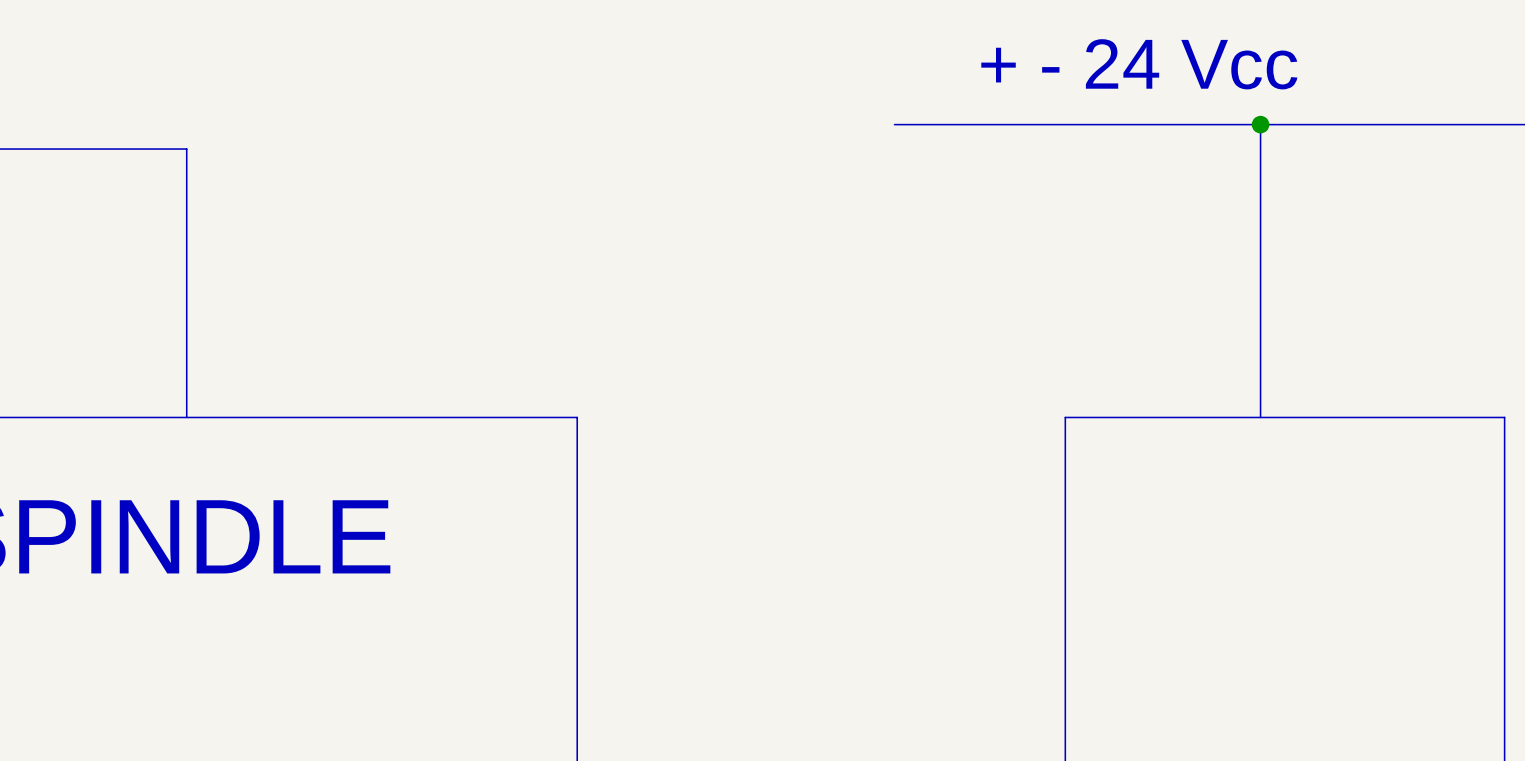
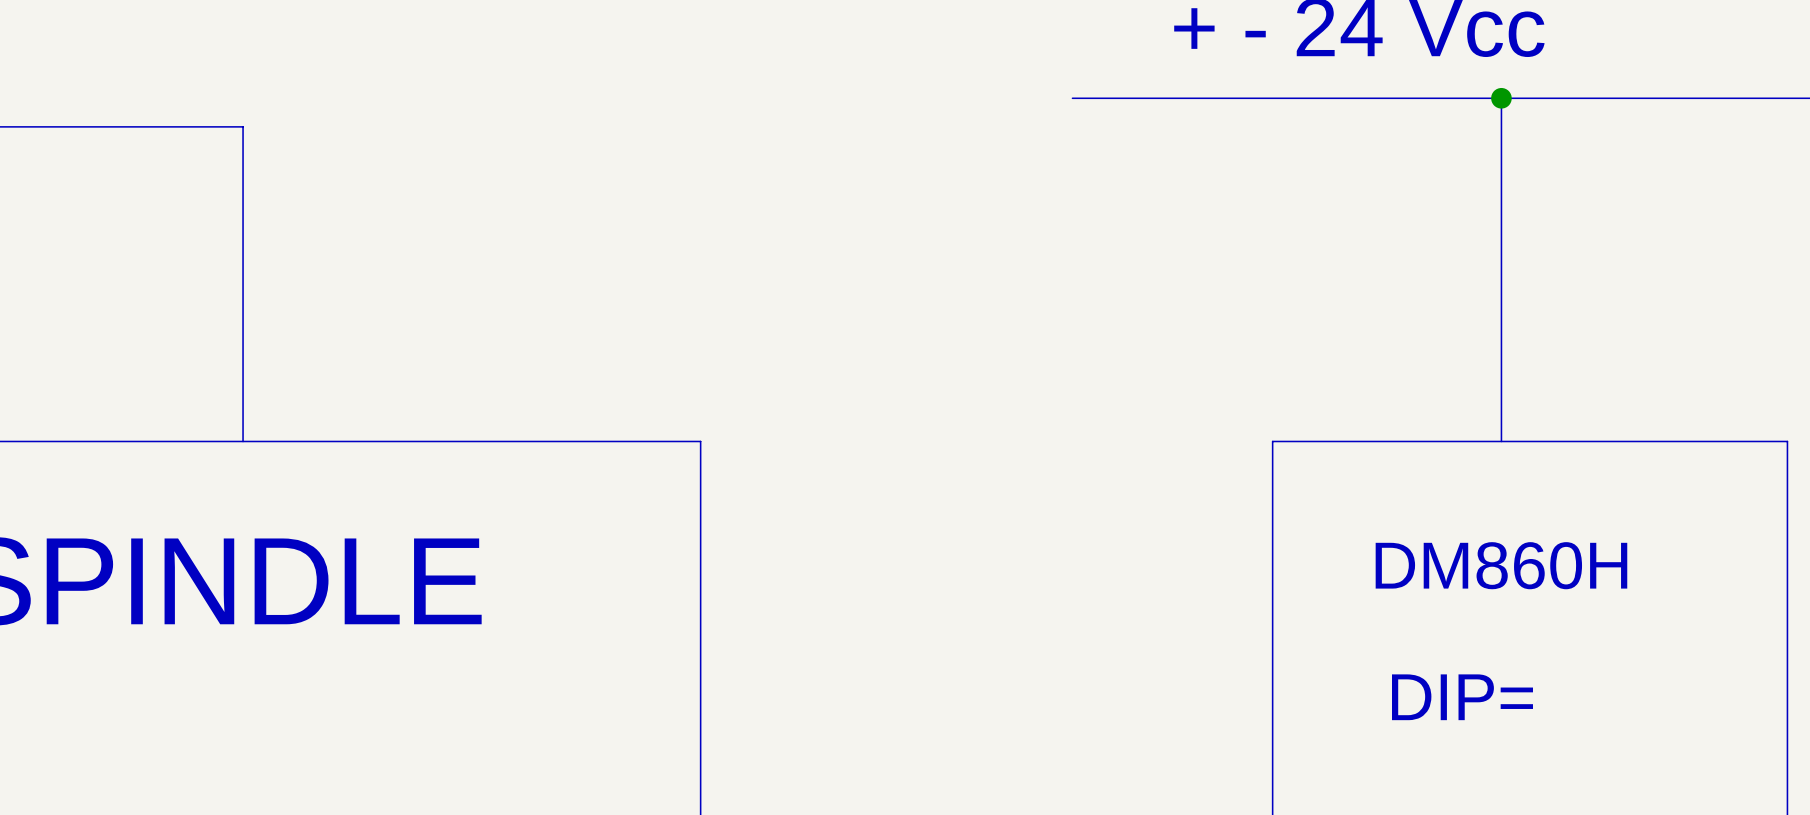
text: none -> DM860H (1501, 565)
text: none -> DIP= (1462, 697)

